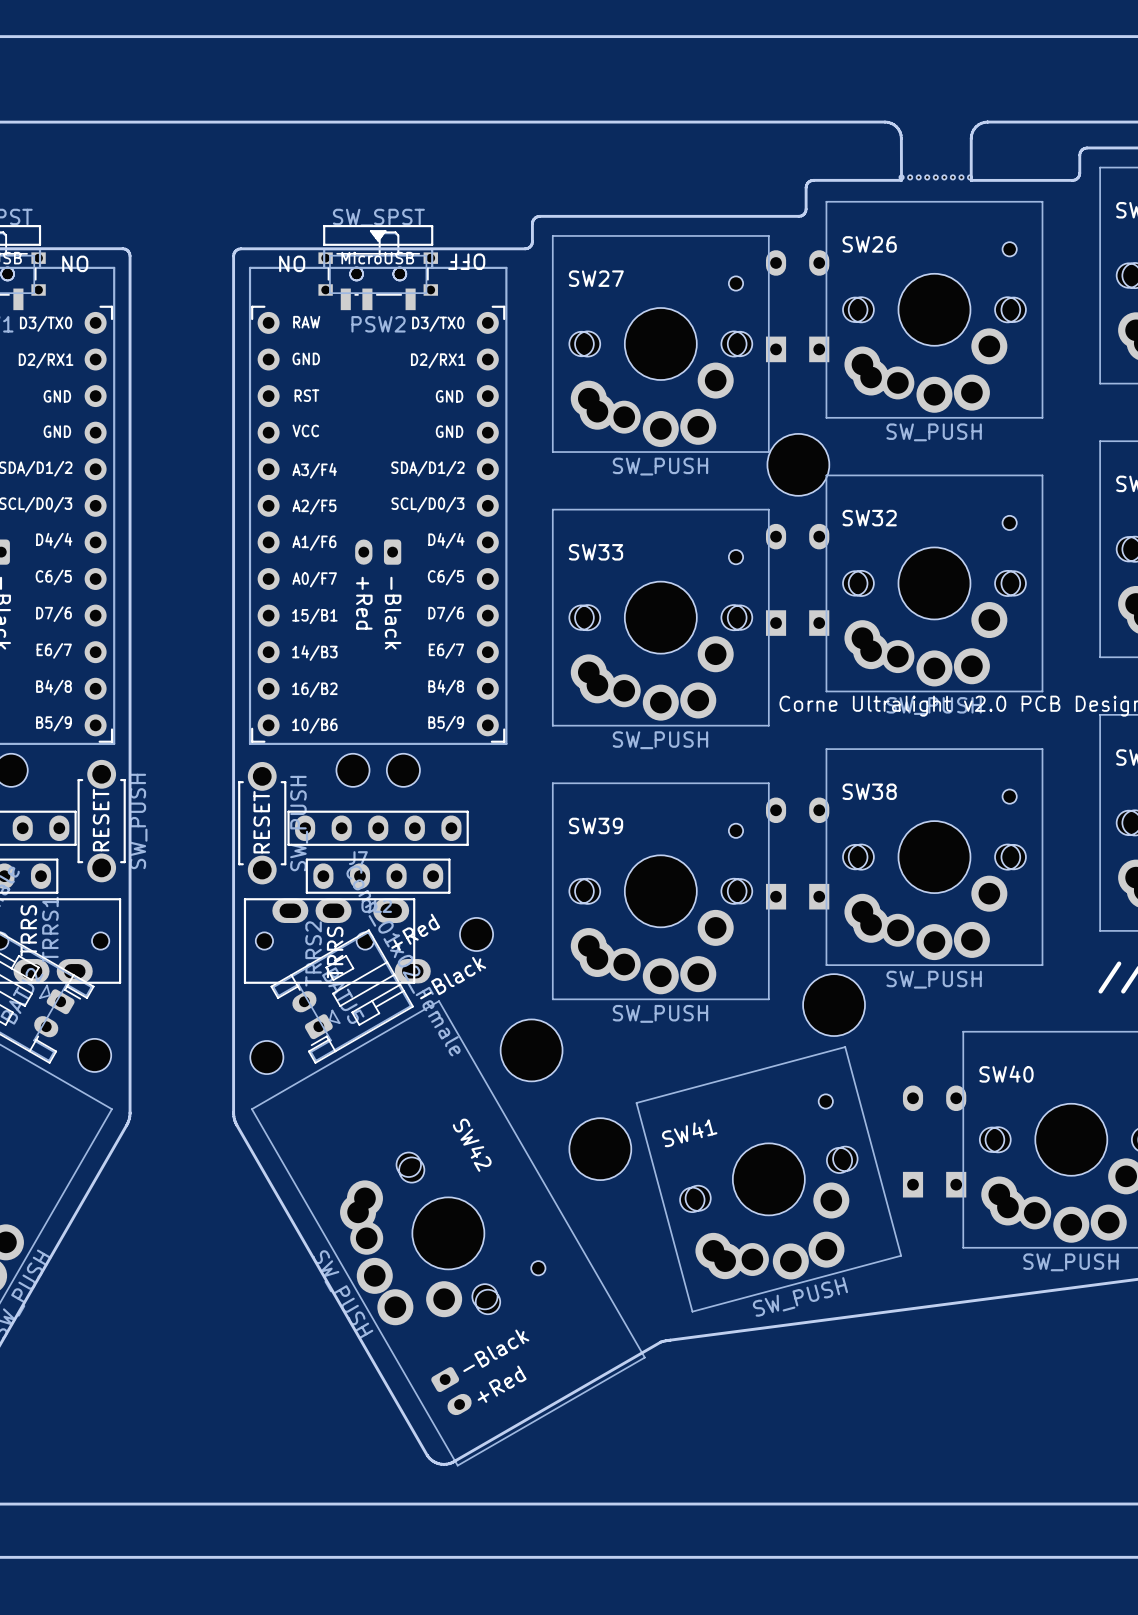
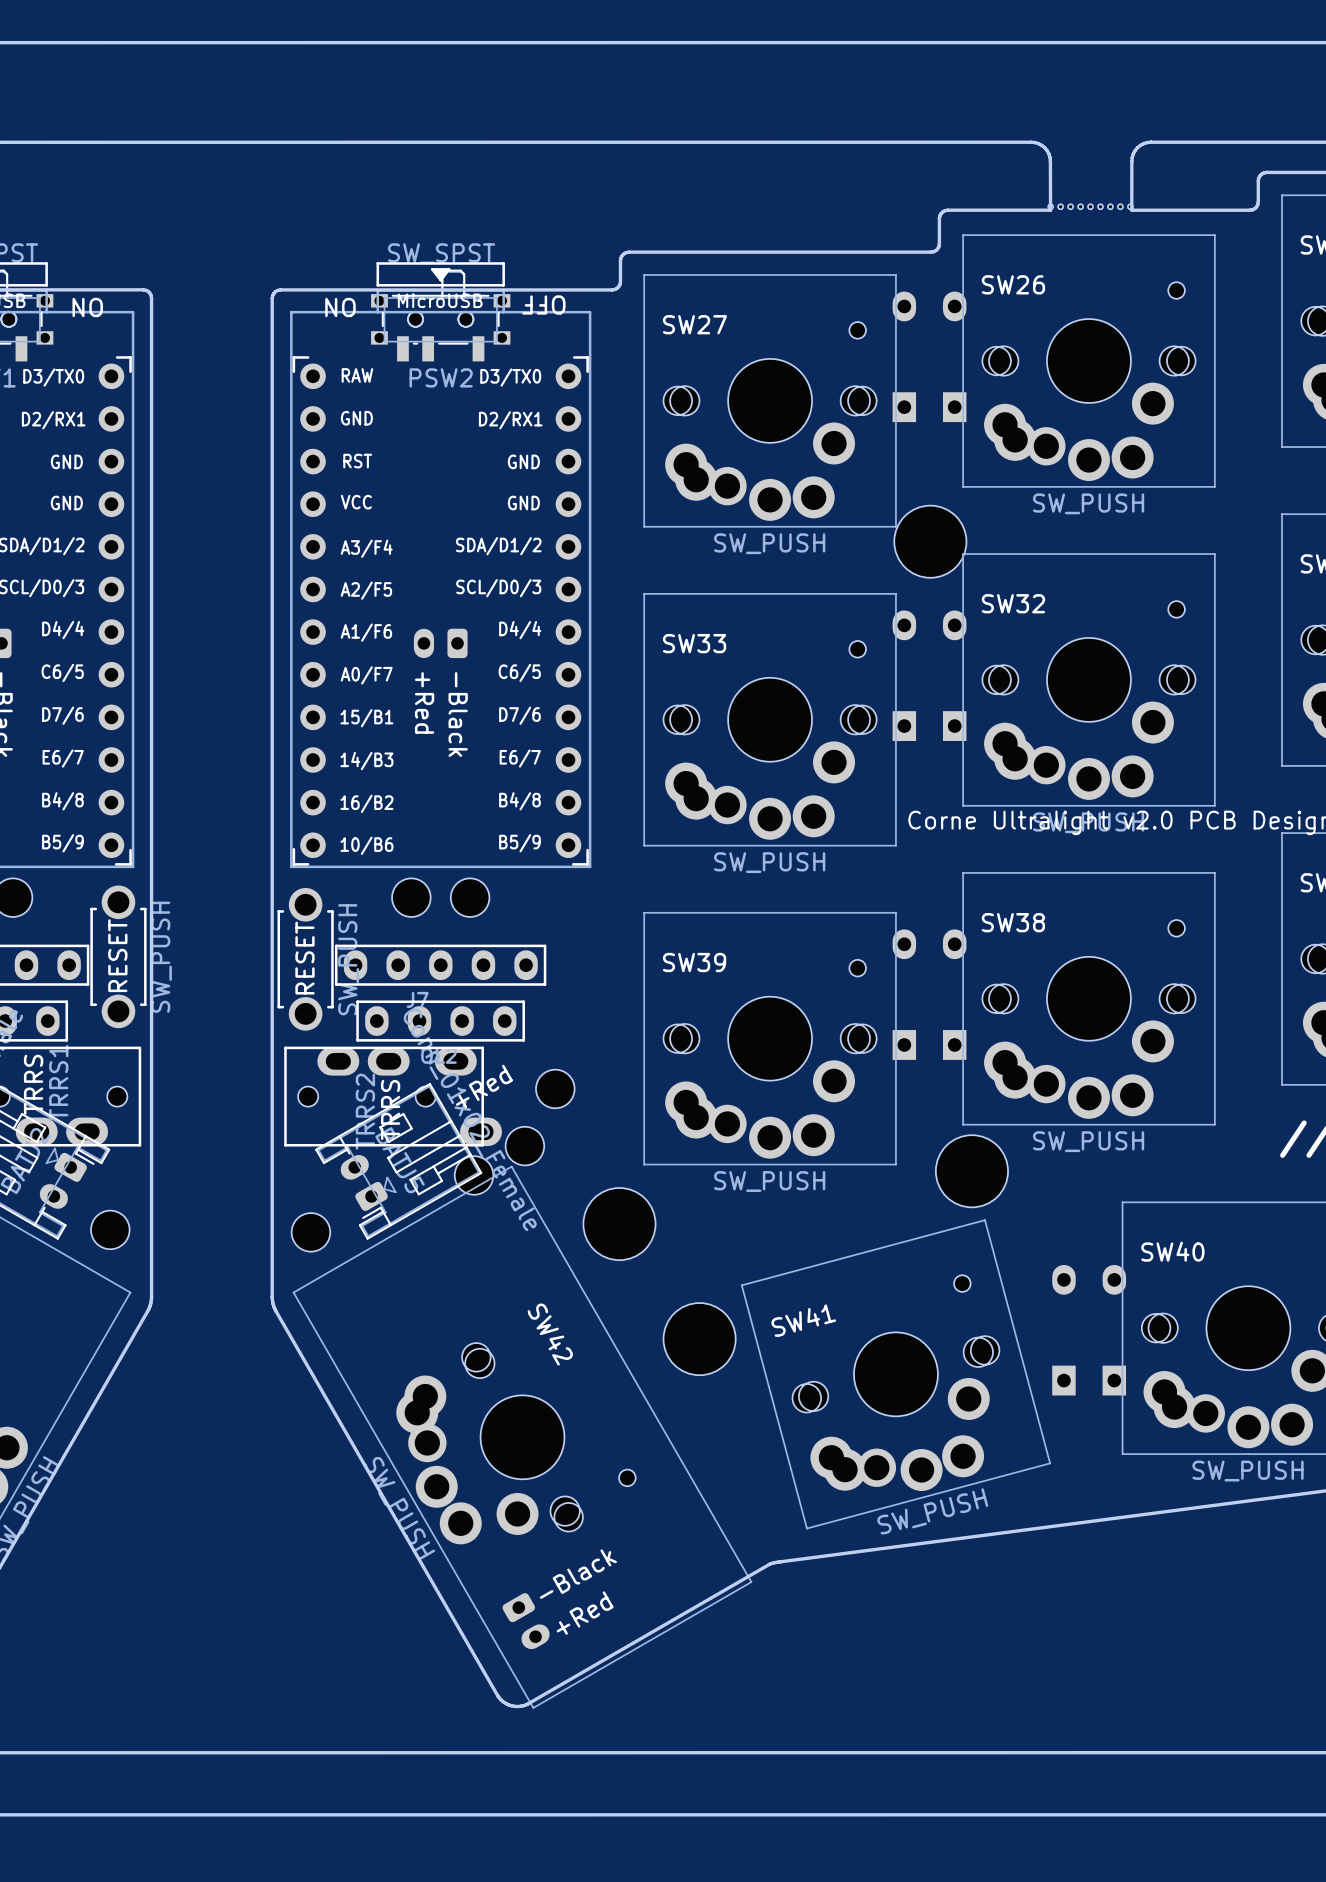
text: -Black (453, 978) -> none
part: none -> (524, 1146)
part: none -> (474, 1175)

